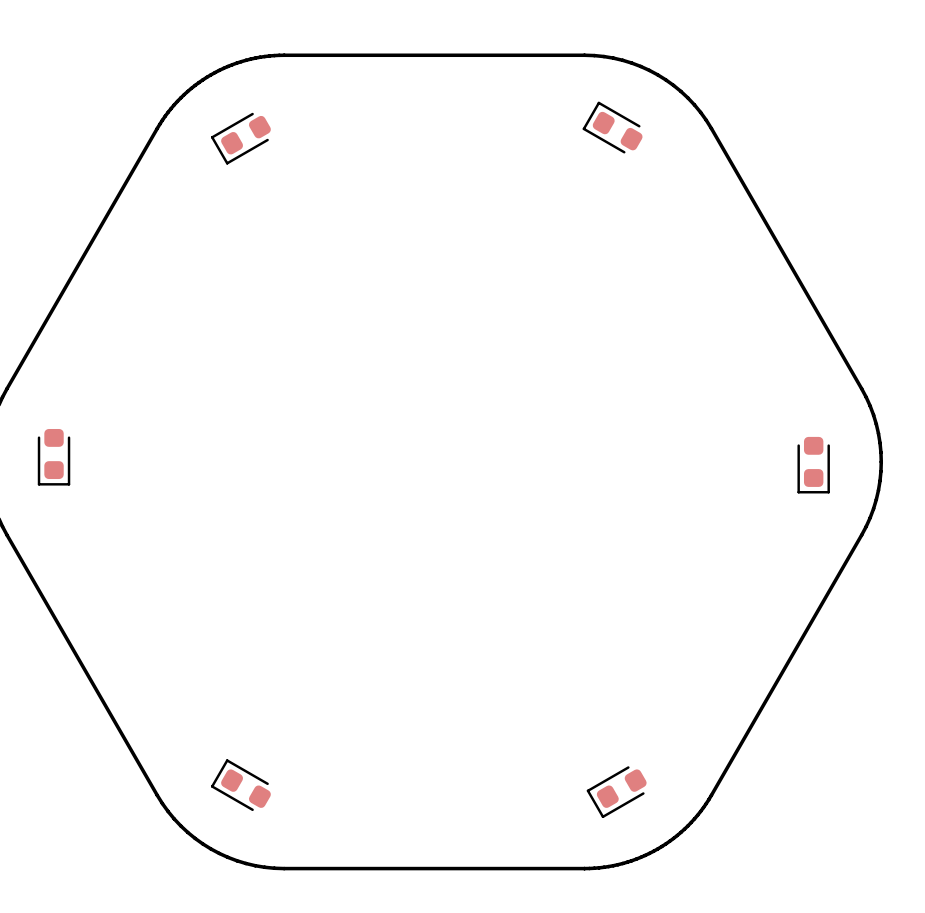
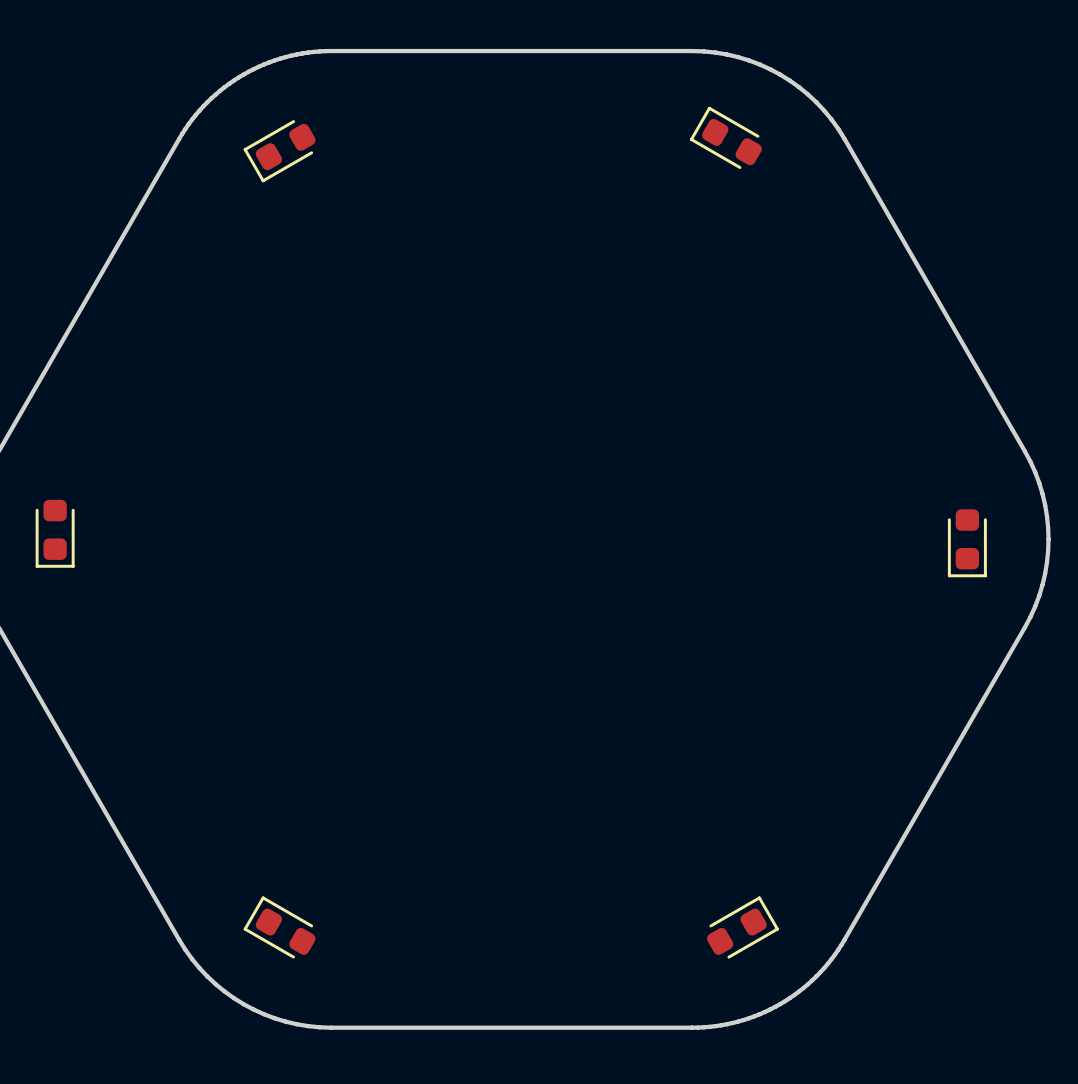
part rotation: 0° (616, 792) -> 180° (742, 927)

